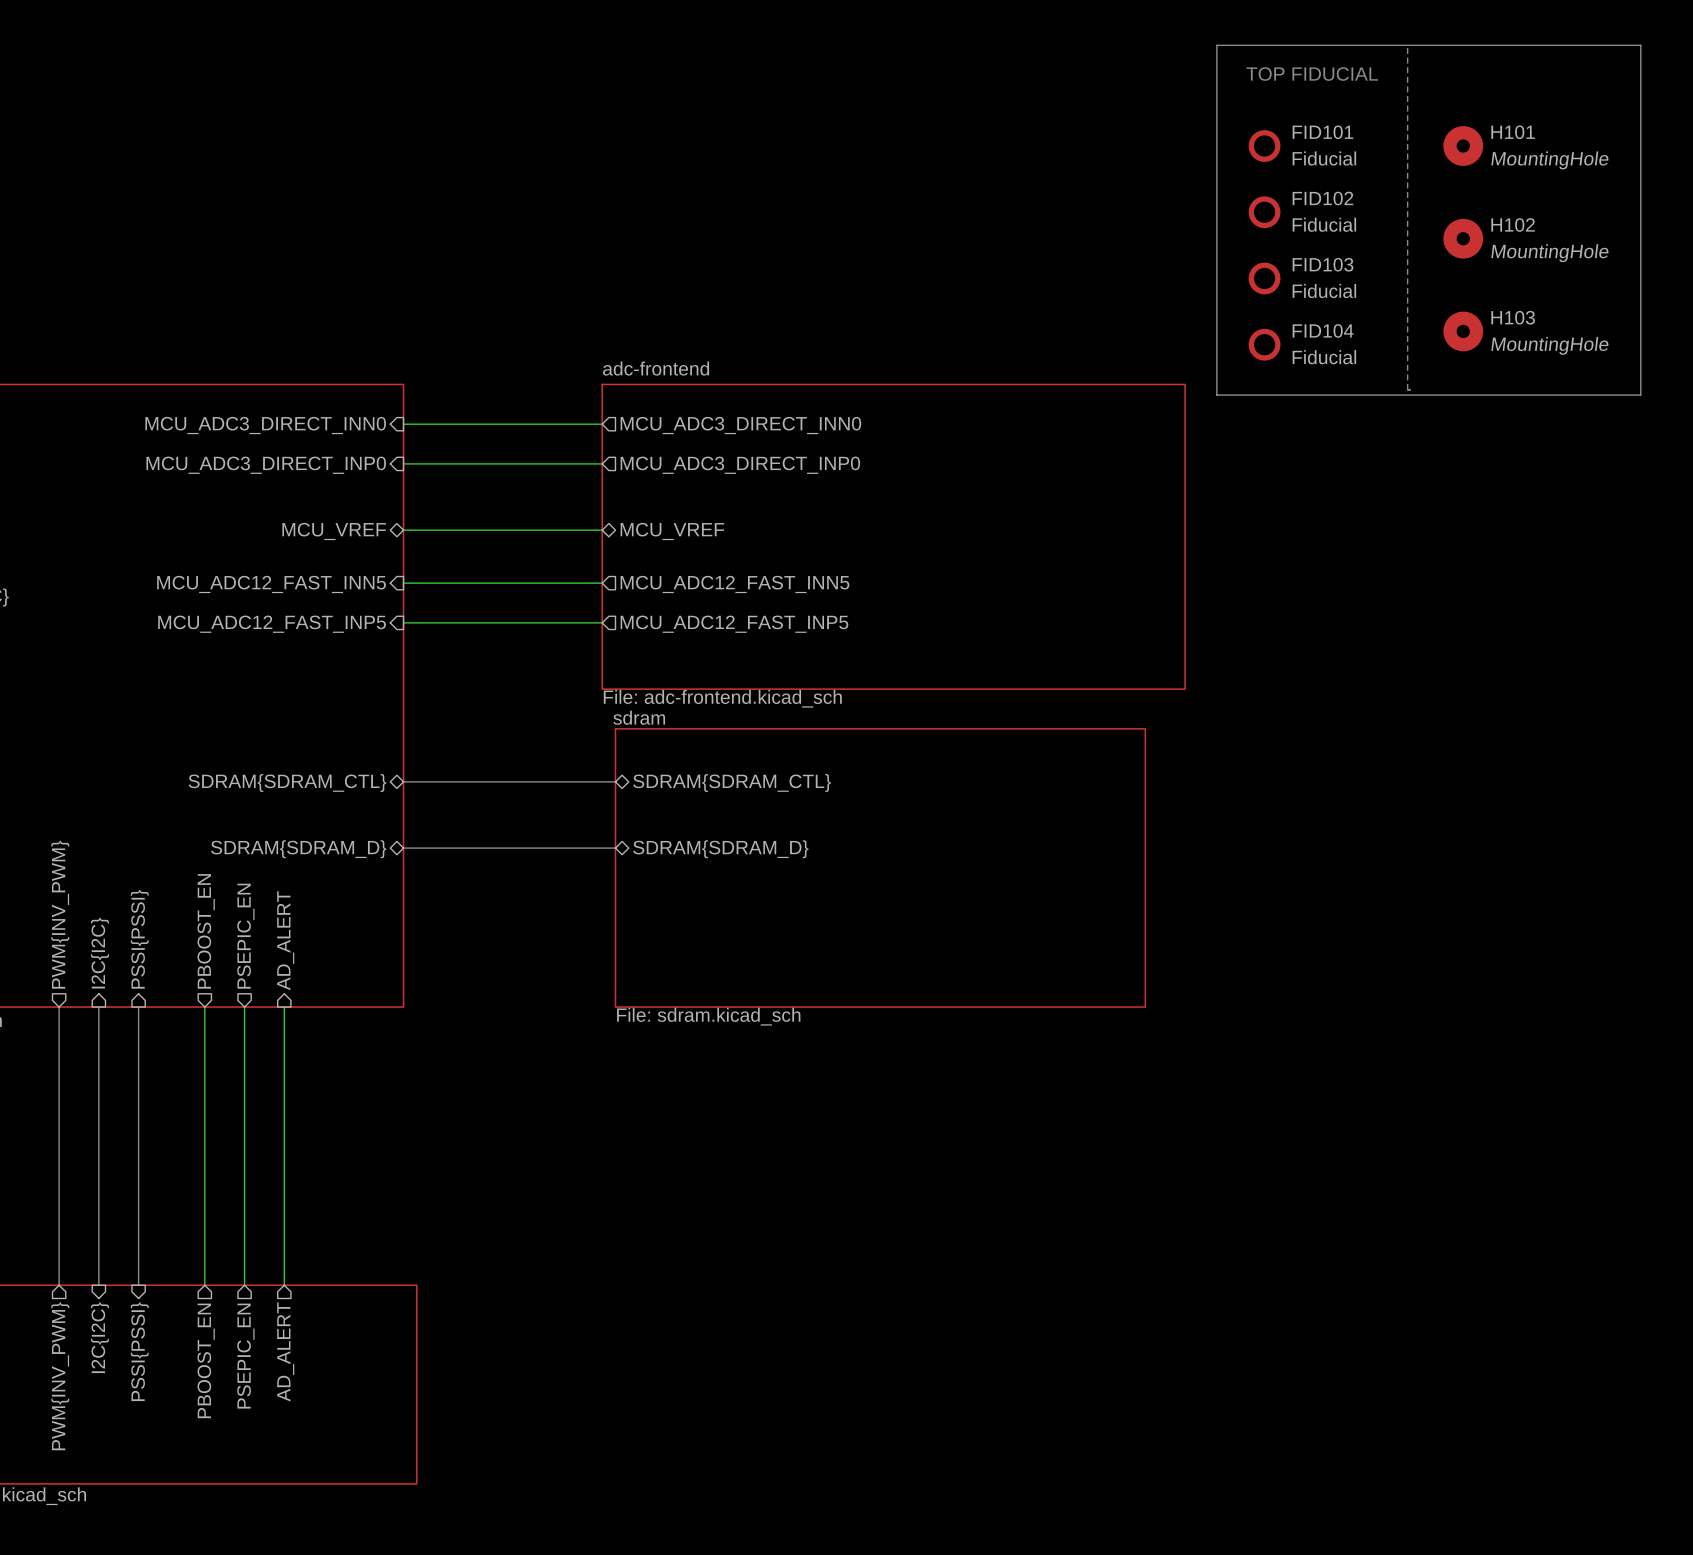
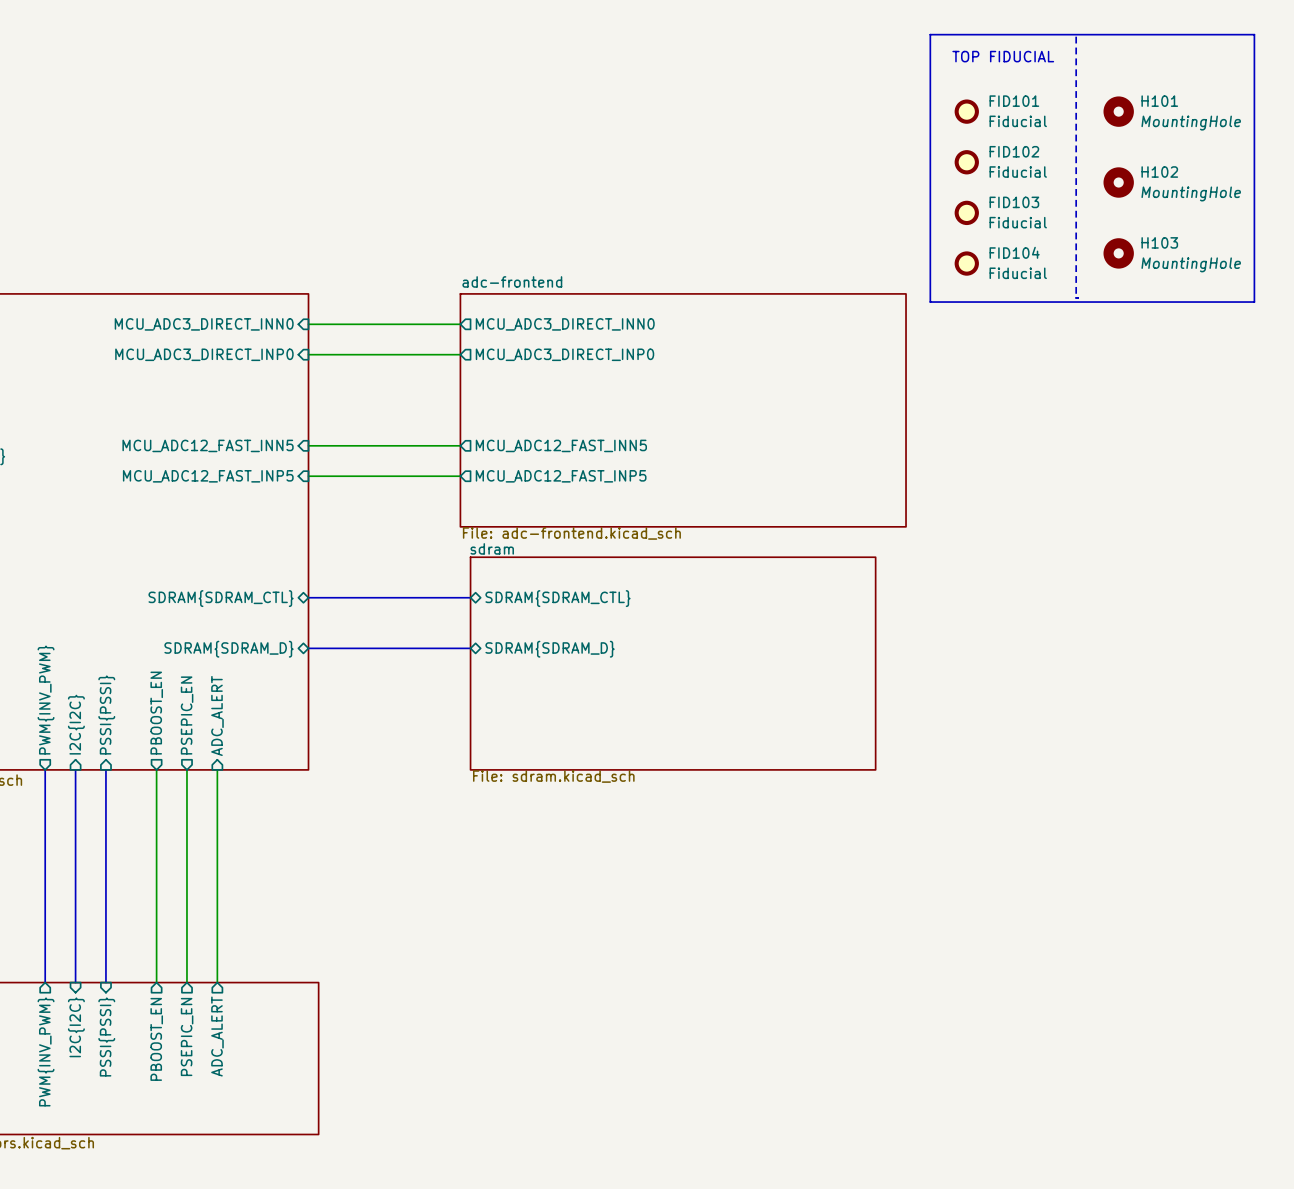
wire: (403, 530) (602, 530) -> none
sheet pin: MCU_VREF (334, 531) -> none
sheet pin: MCU_VREF (672, 531) -> none
sheet pin: AD_ALERT (285, 940) -> ADC_ALERT (217, 715)
sheet pin: AD_ALERT (285, 1352) -> ADC_ALERT (217, 1036)

